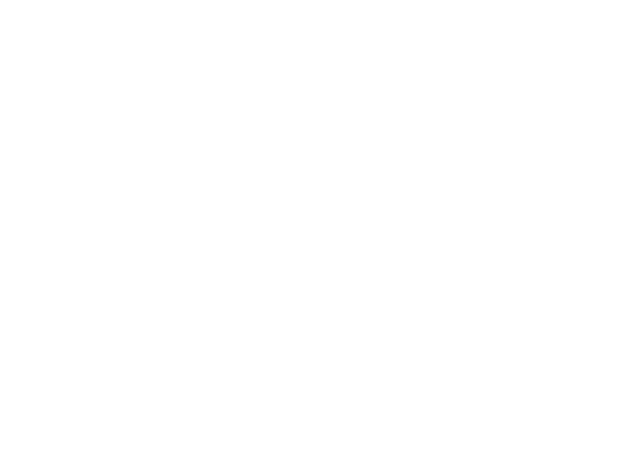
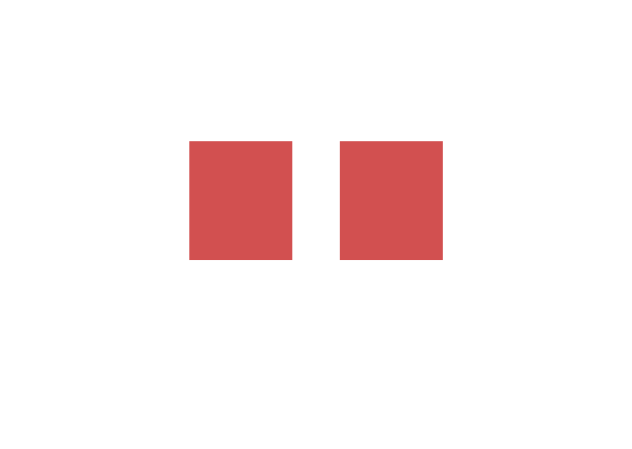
part: none -> (316, 200)

